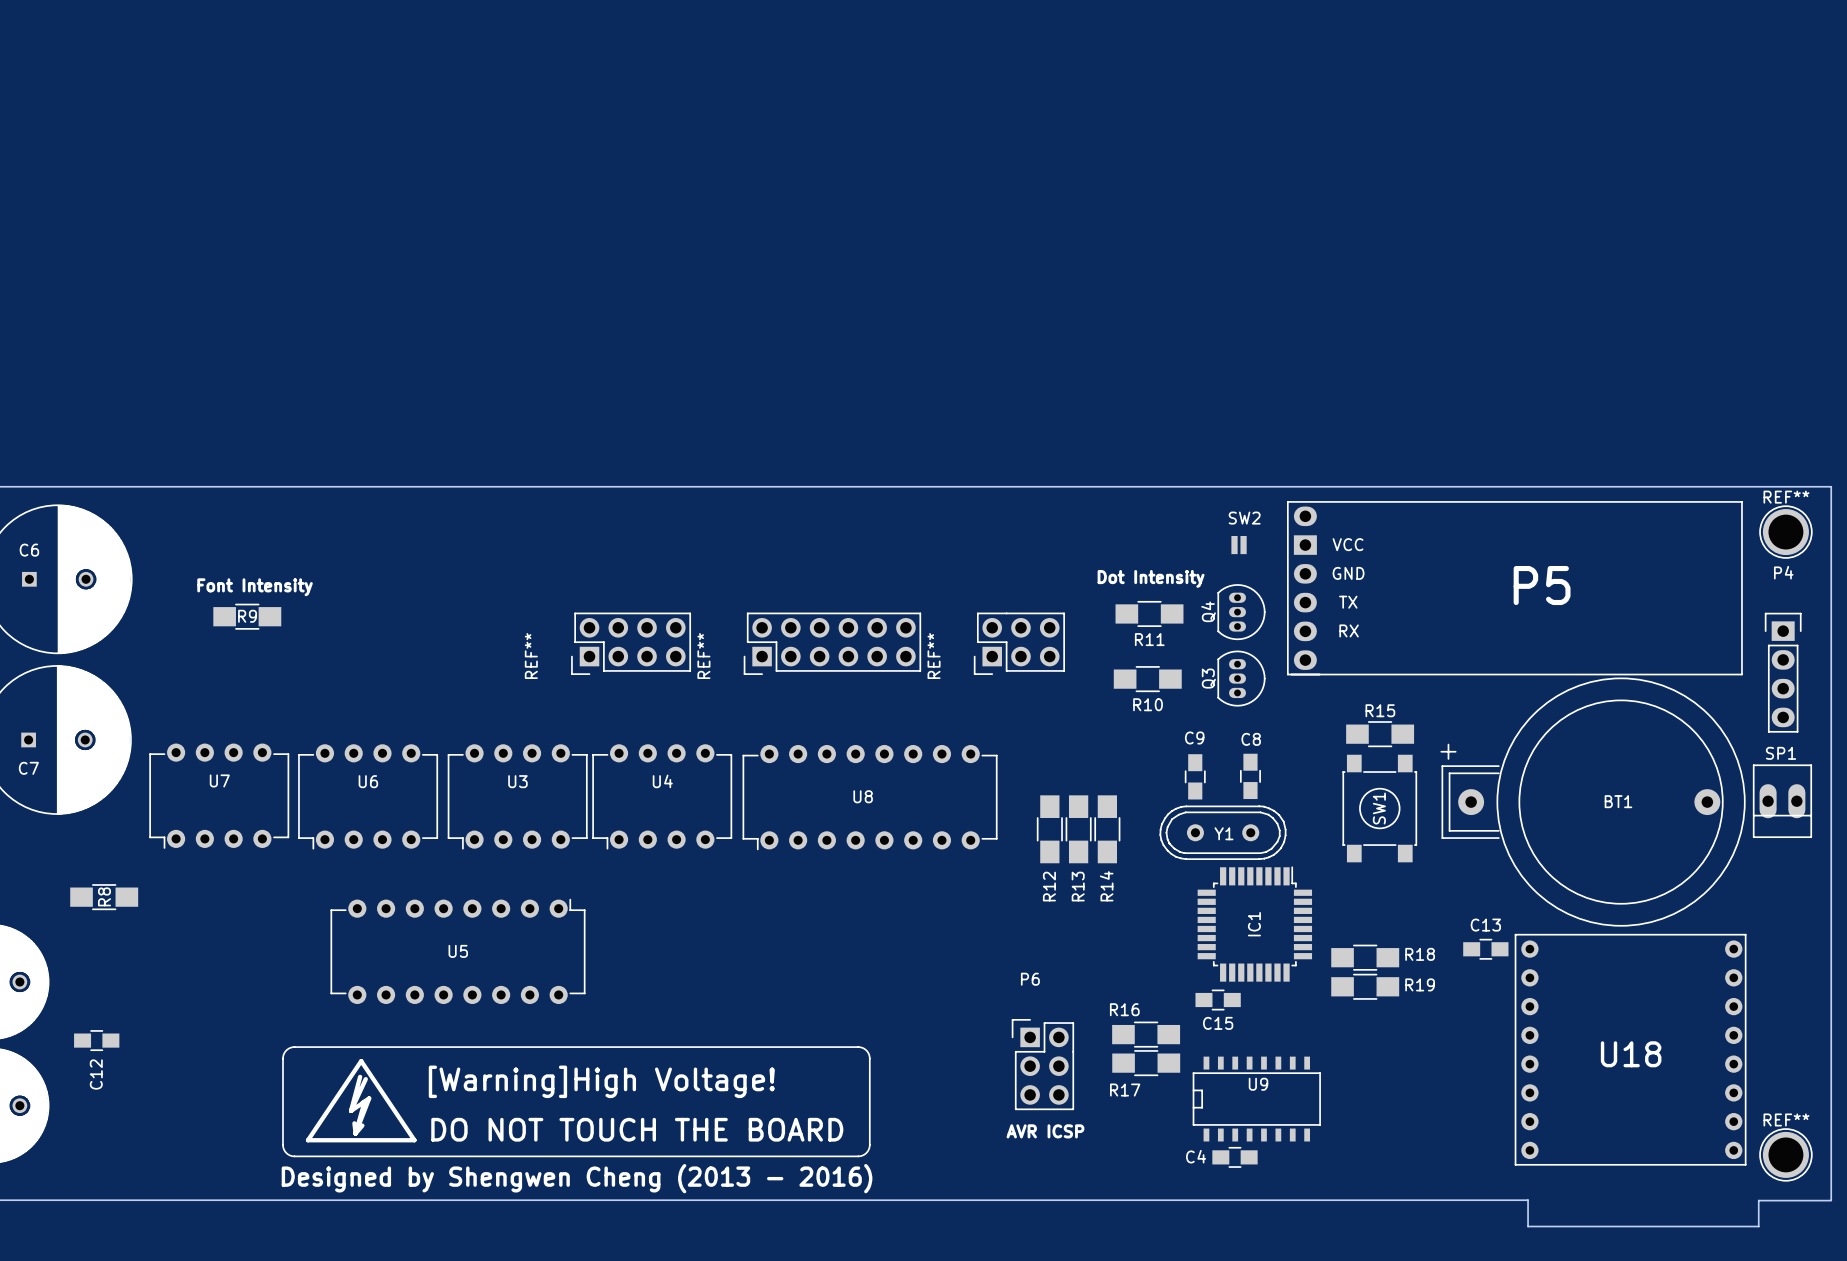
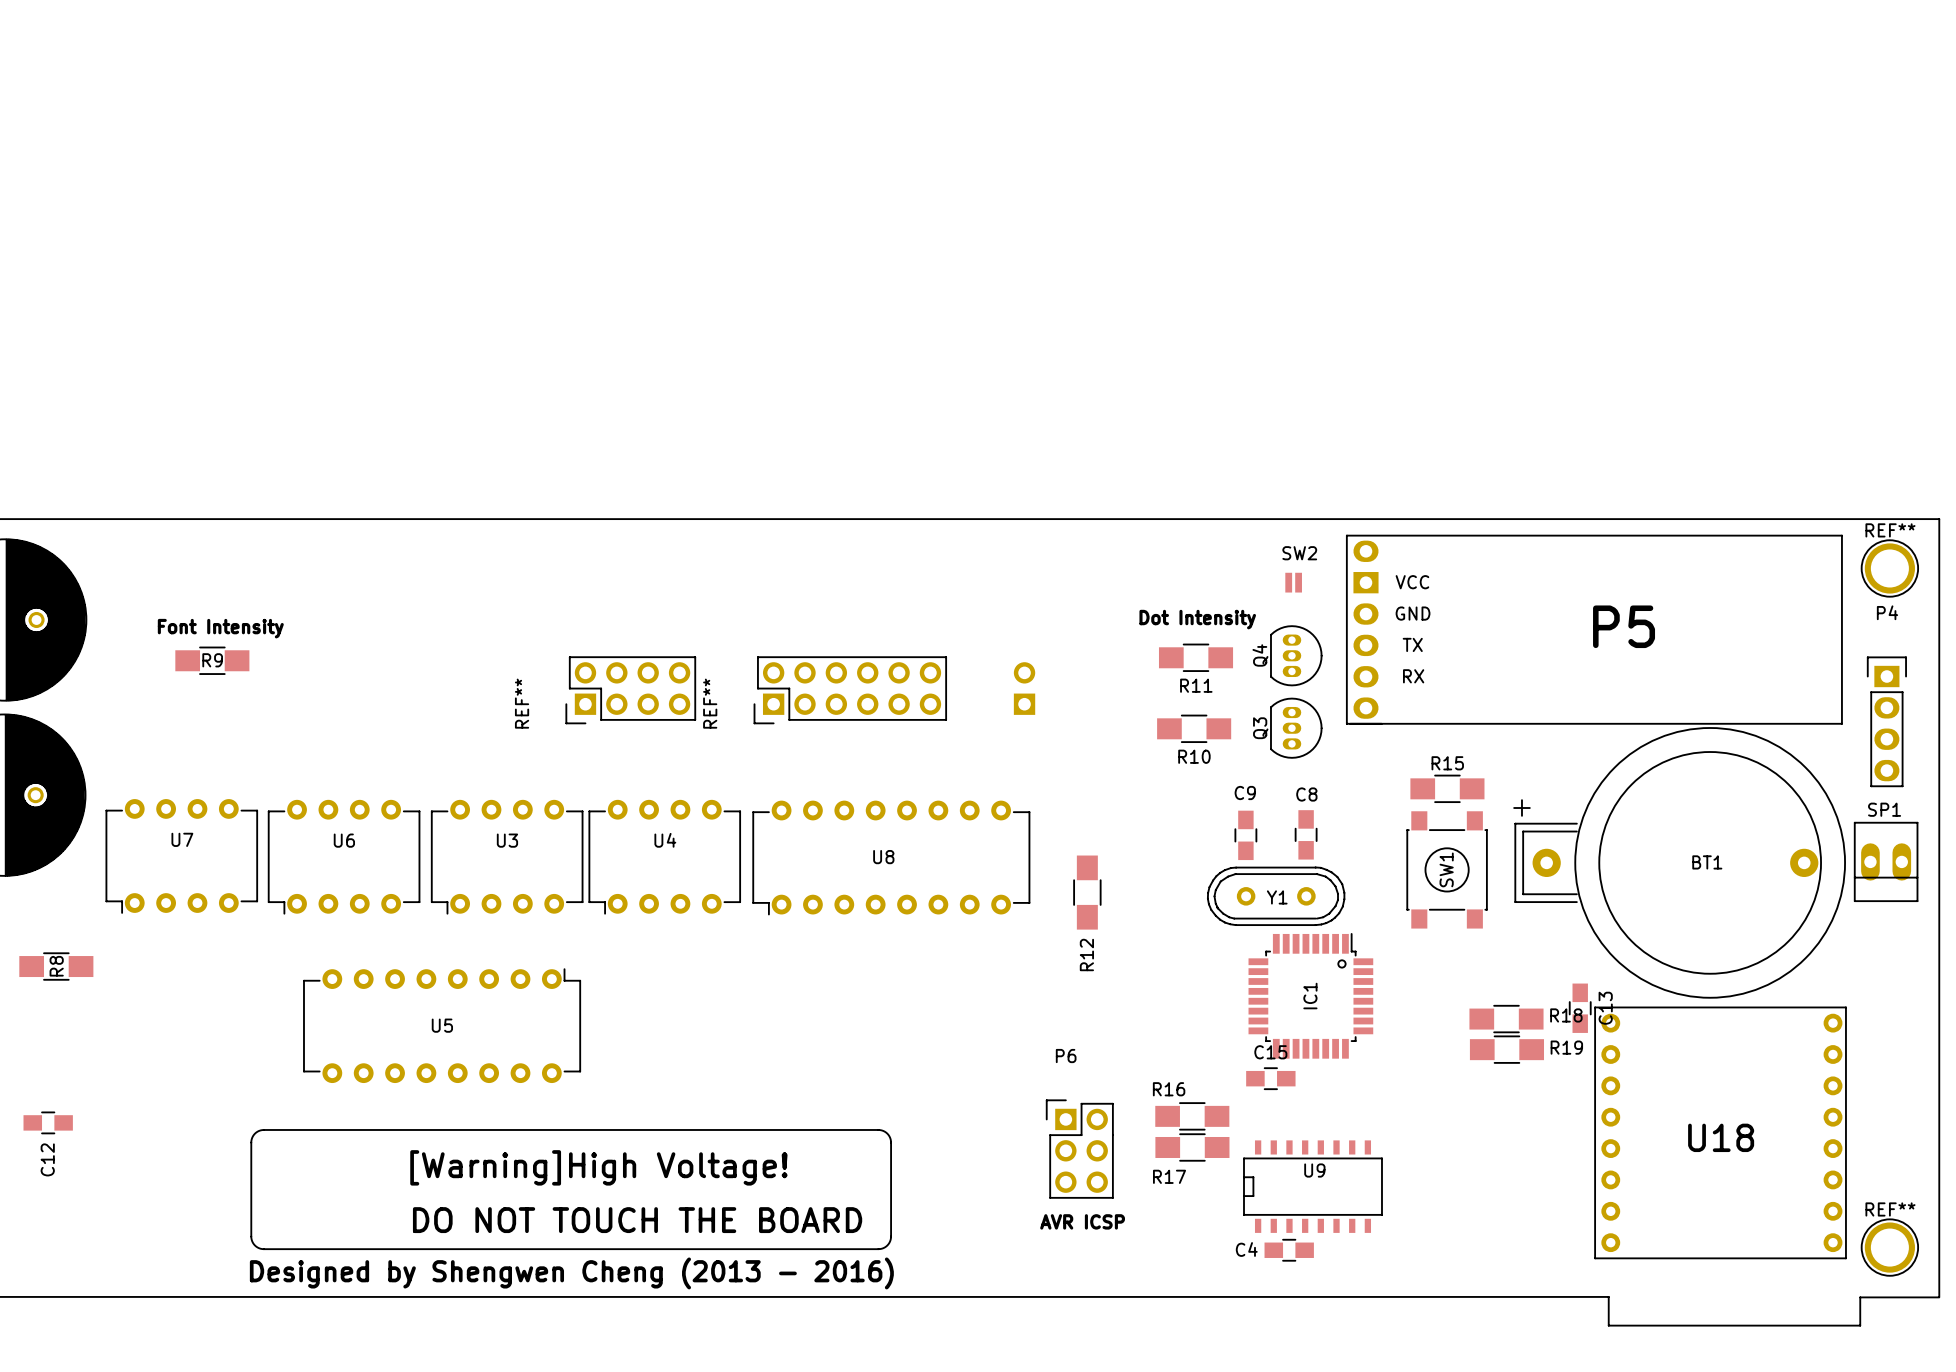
REF**: (1019, 643) -> none
R13: (1078, 829) -> none
R14: (1107, 829) -> none
drawing: none -> [1337, 959, 1347, 969]
C13 rotation: 0° (1485, 949) -> 90° clockwise (1580, 1008)
R18 position: (1365, 957) -> (1506, 1019)
R19 position: (1365, 986) -> (1506, 1049)
C15 name position: C15 (1218, 1023) -> C15 (1270, 1052)
drawing: [305, 1058, 417, 1143] -> none

